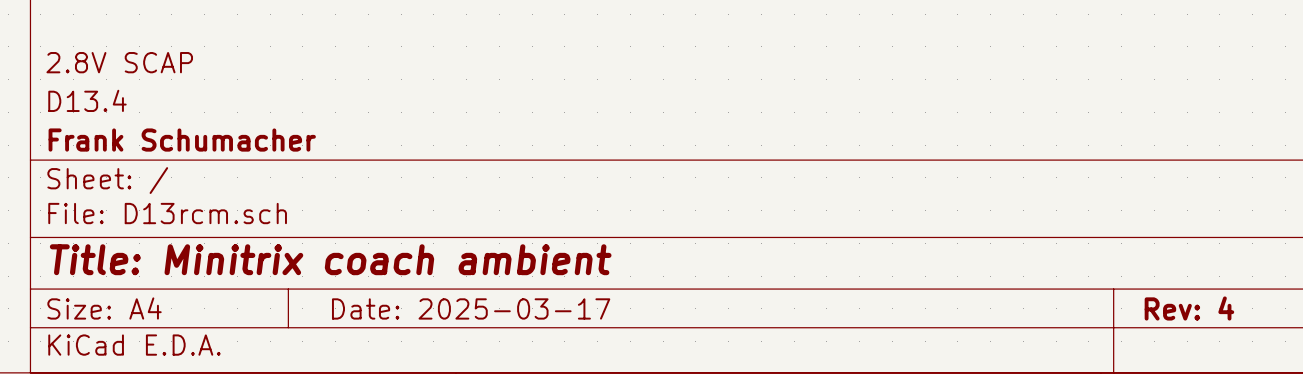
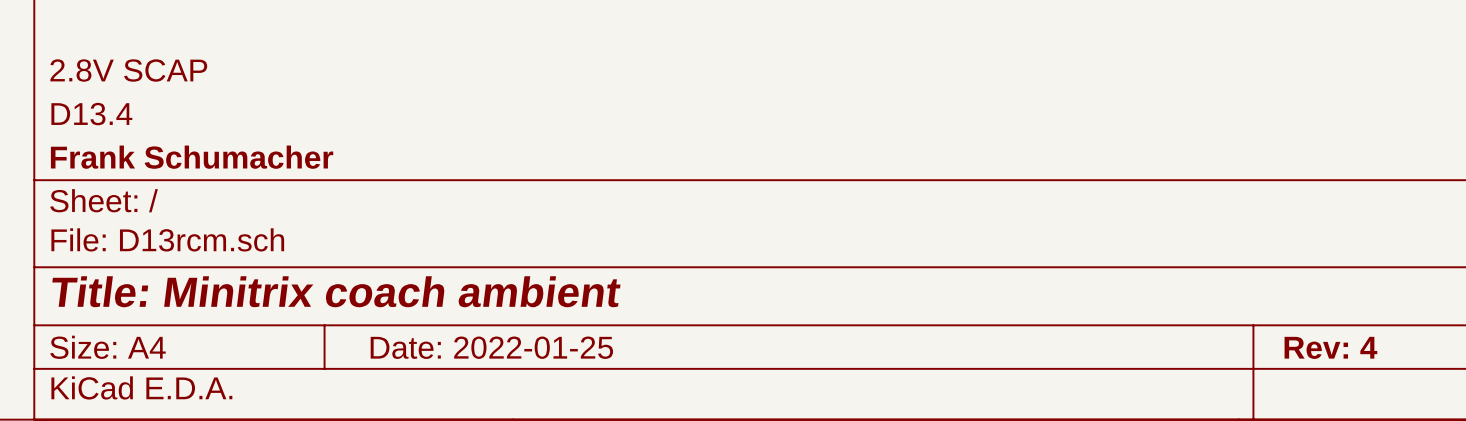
title block: Date: 2025-03-17 (471, 308) -> Date: 2022-01-25 (491, 347)

